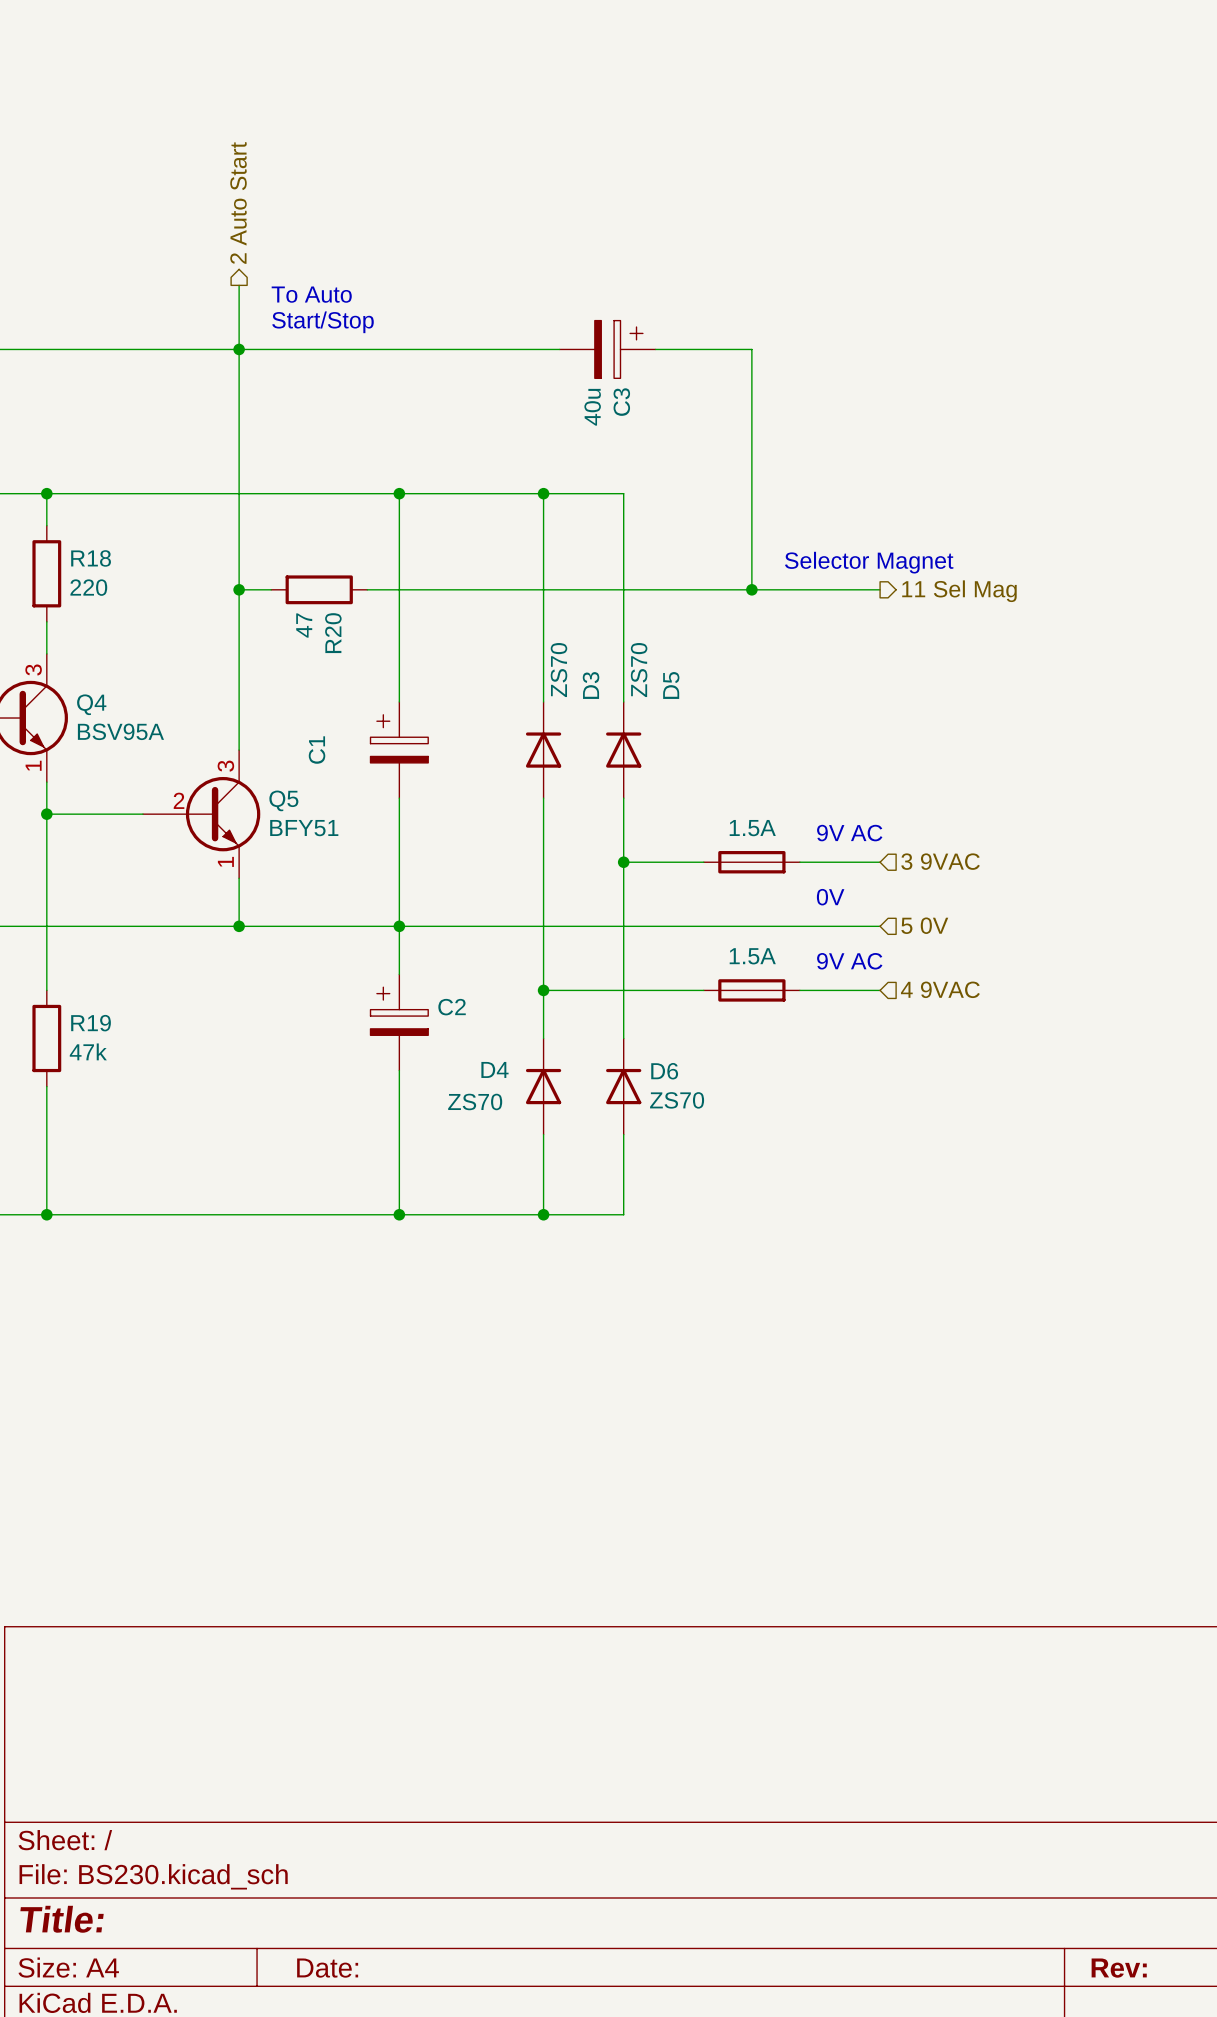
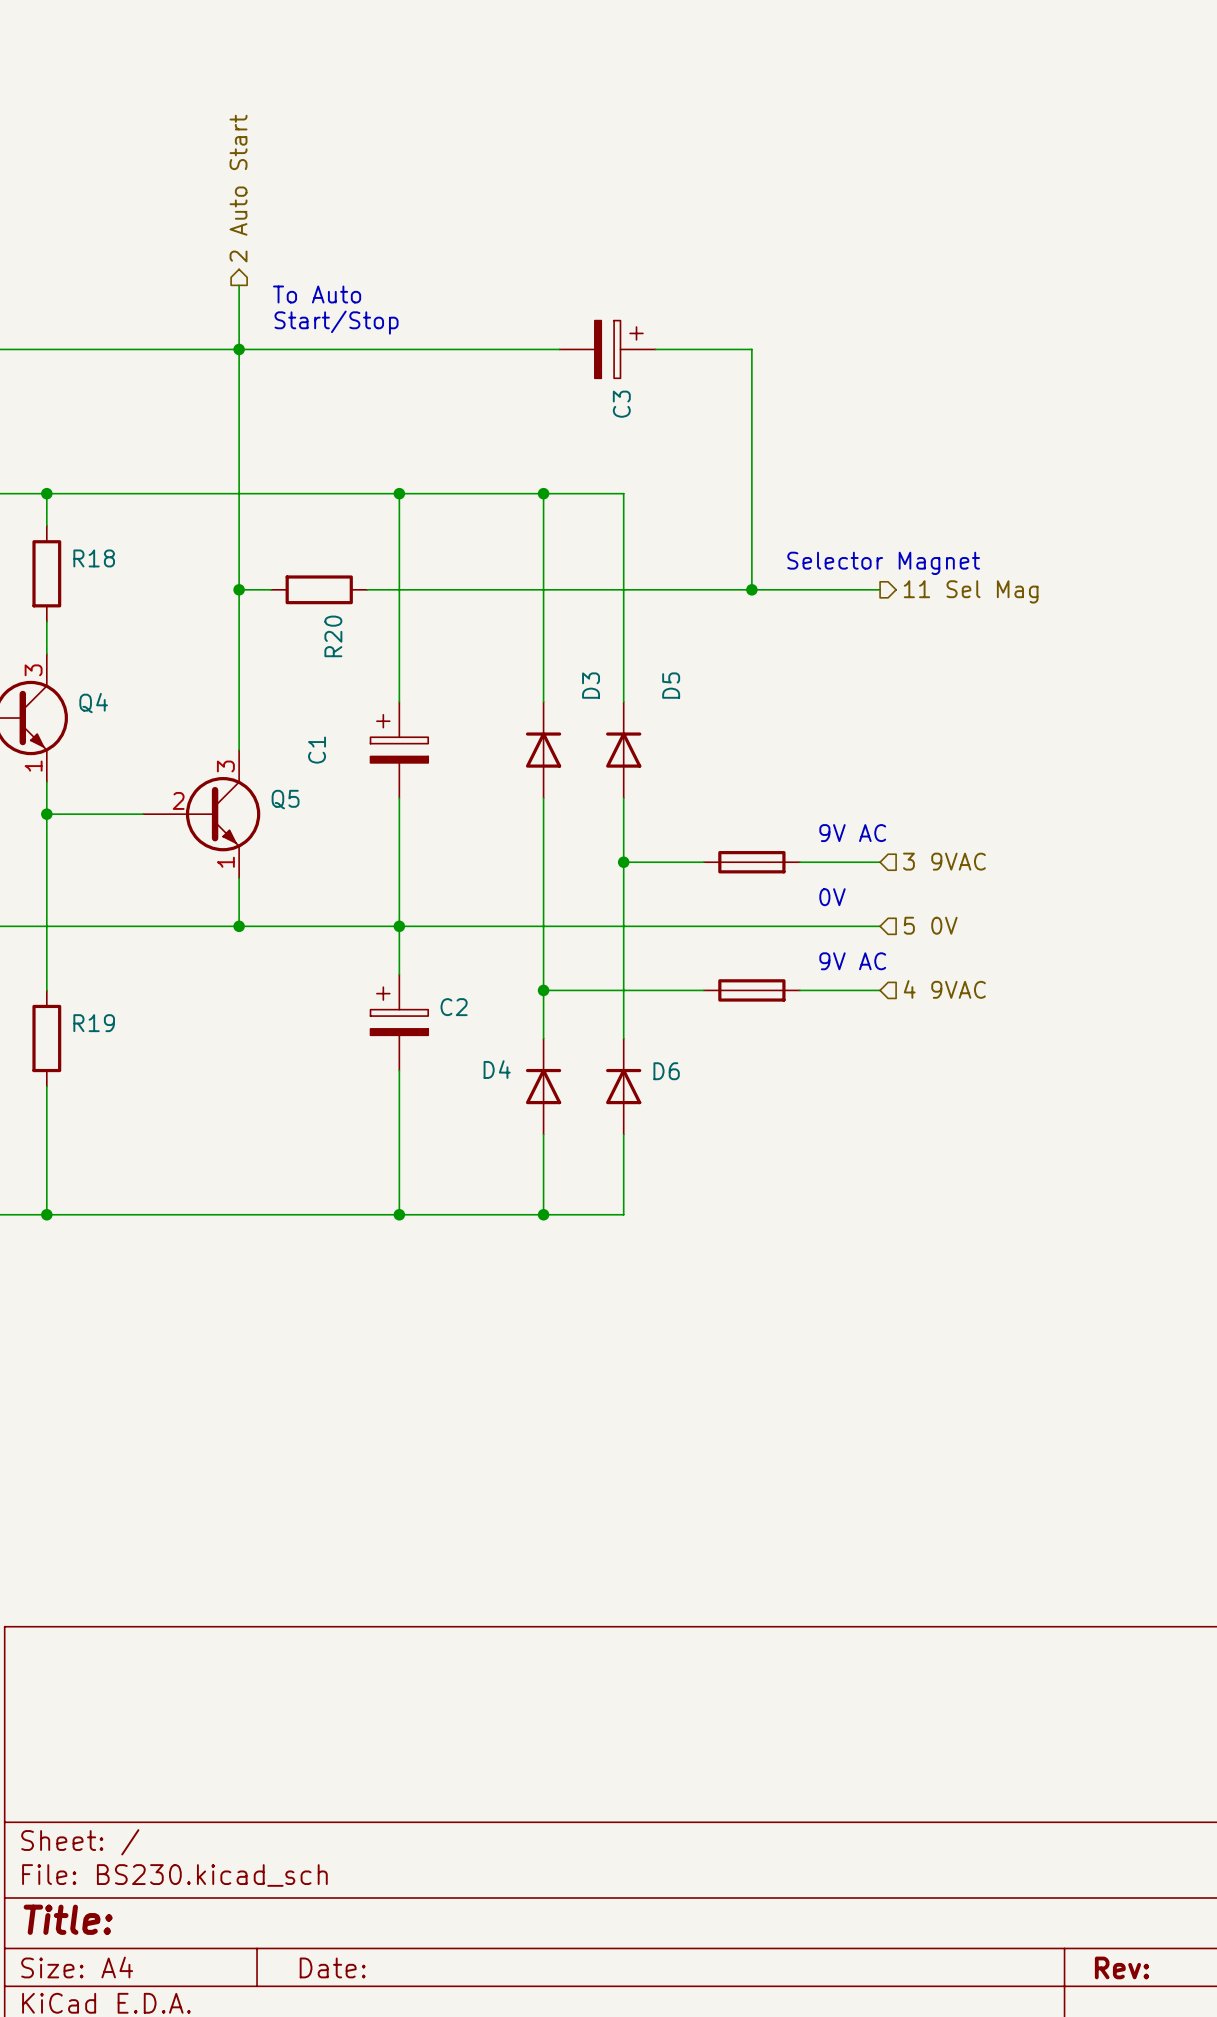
C3 value: 40u (592, 407) -> none
R18 value: 220 (88, 587) -> none
R20 value: 47 (304, 625) -> none
D3 value: ZS70 (558, 670) -> none
D5 value: ZS70 (639, 670) -> none
Q4 value: BSV95A (120, 731) -> none
Q5 value: BFY51 (304, 828) -> none
part value: 1.5A (752, 828) -> none
part value: 1.5A (752, 956) -> none
R19 value: 47k (88, 1051) -> none
D6 value: ZS70 (677, 1100) -> none
D4 value: ZS70 (475, 1101) -> none

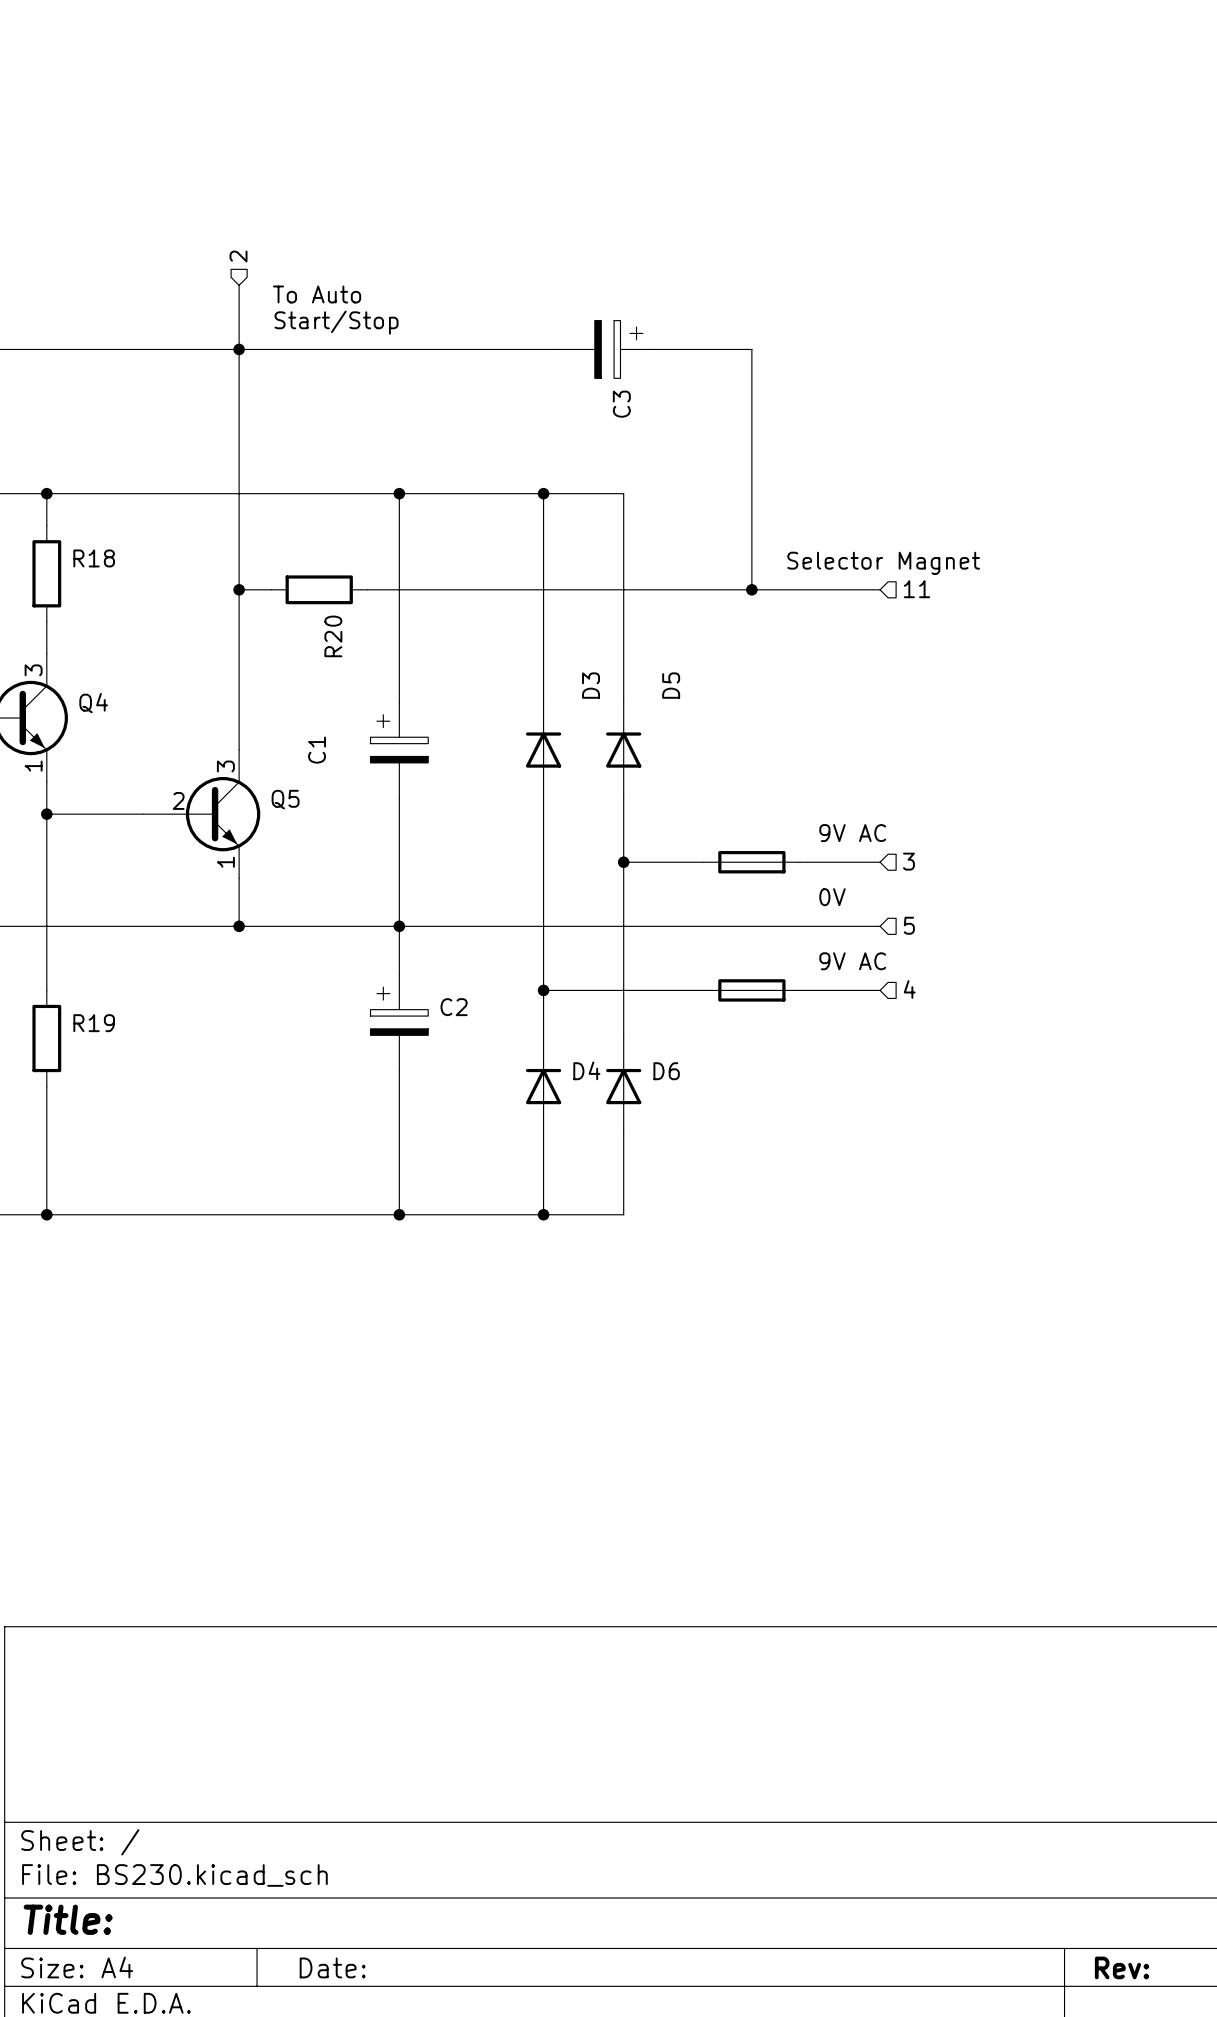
hierarchical label shape: output (238, 188) -> input (238, 256)
hierarchical label: 2 Auto Start (238, 188) -> 2 (238, 256)
hierarchical label shape: output (971, 591) -> input (916, 589)
hierarchical label: 11 Sel Mag (971, 591) -> 11 (916, 589)
hierarchical label: 3 9VAC (944, 861) -> 3 (908, 861)
hierarchical label: 5 0V (930, 925) -> 5 (909, 925)
hierarchical label: 4 9VAC (944, 989) -> 4 (909, 989)
D4 name position: D4 (497, 1069) -> D4 (586, 1070)

